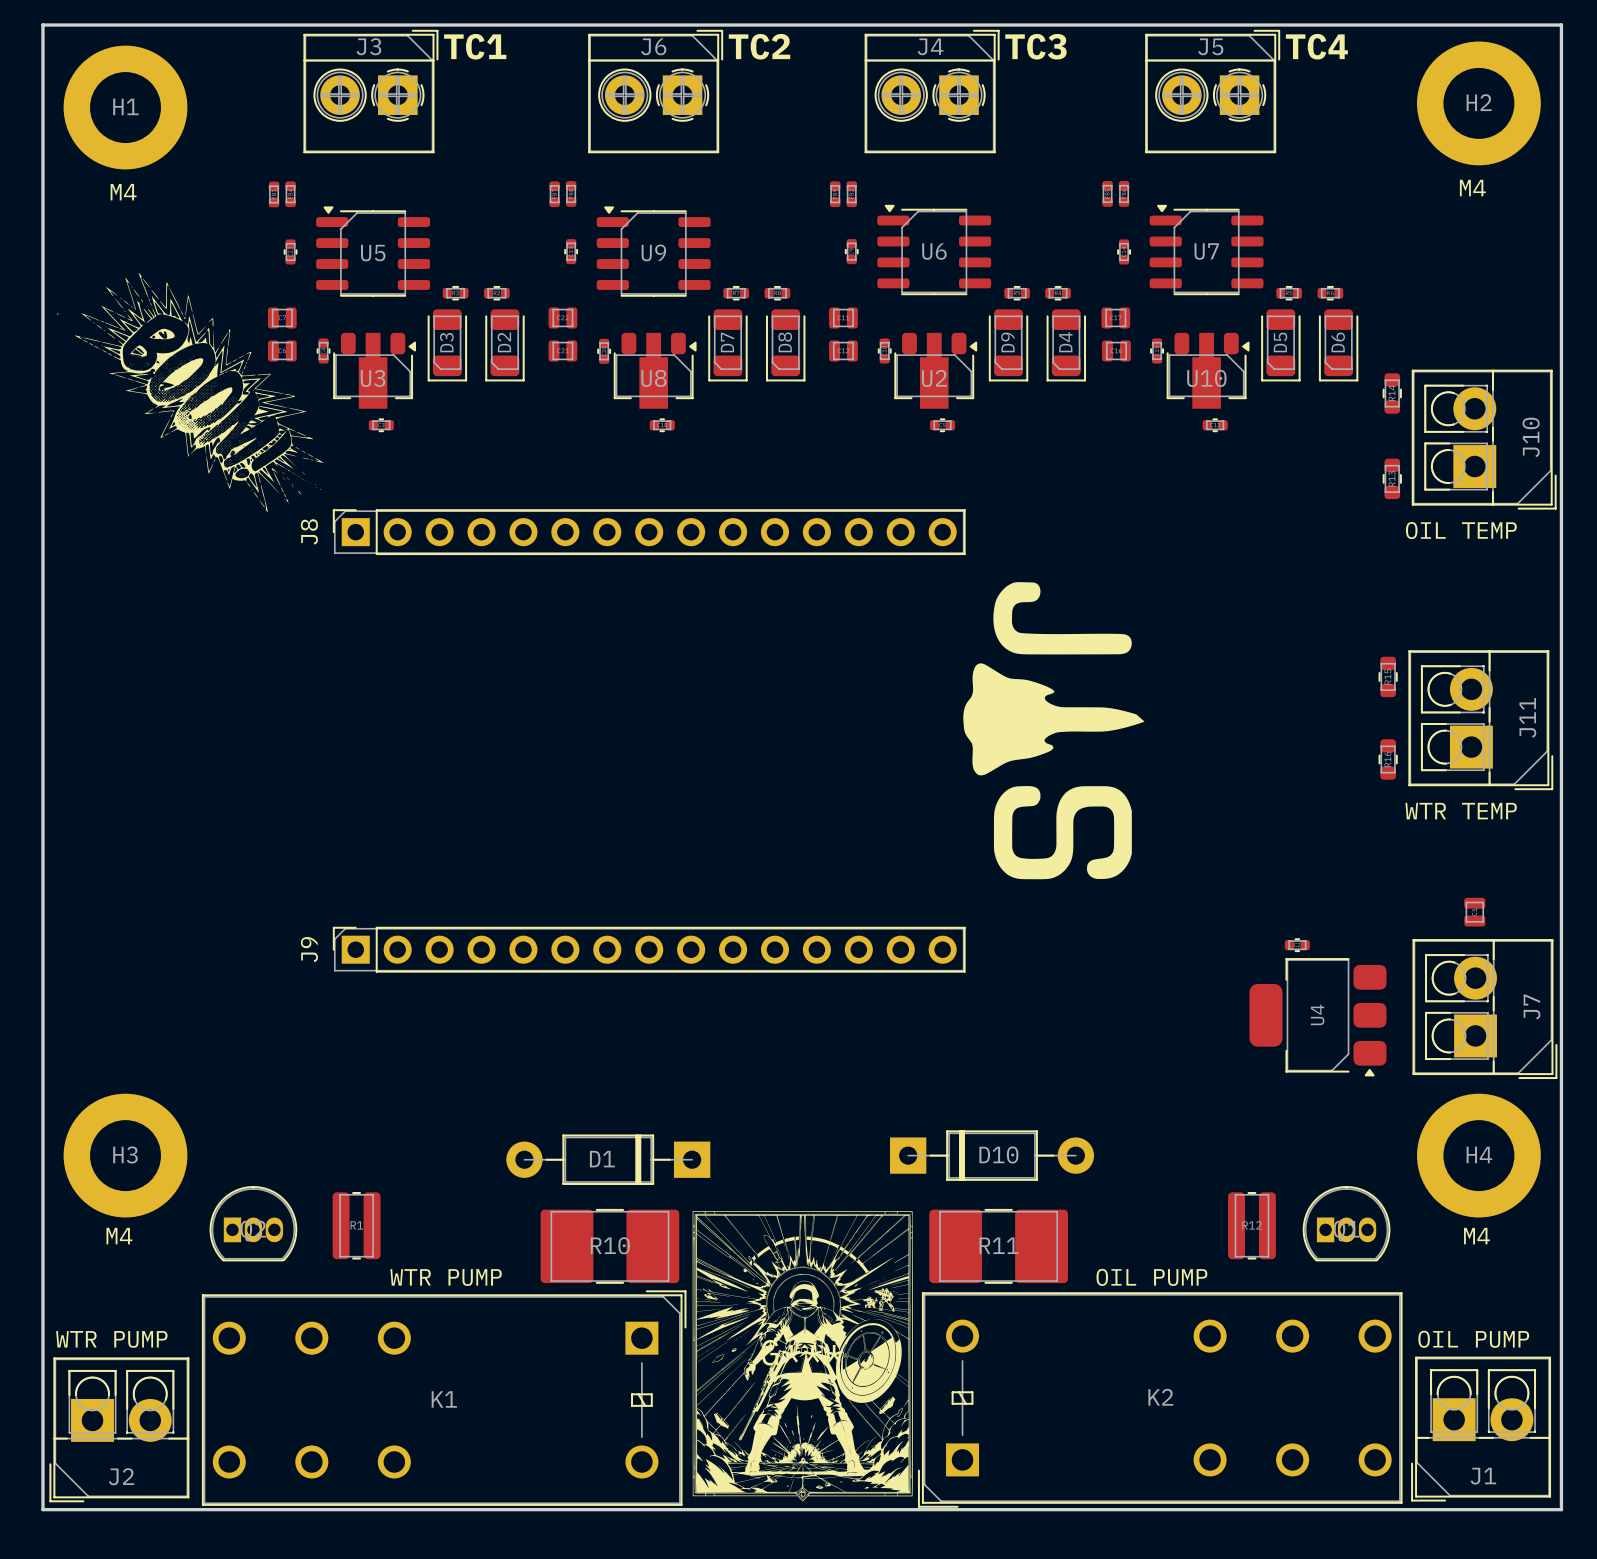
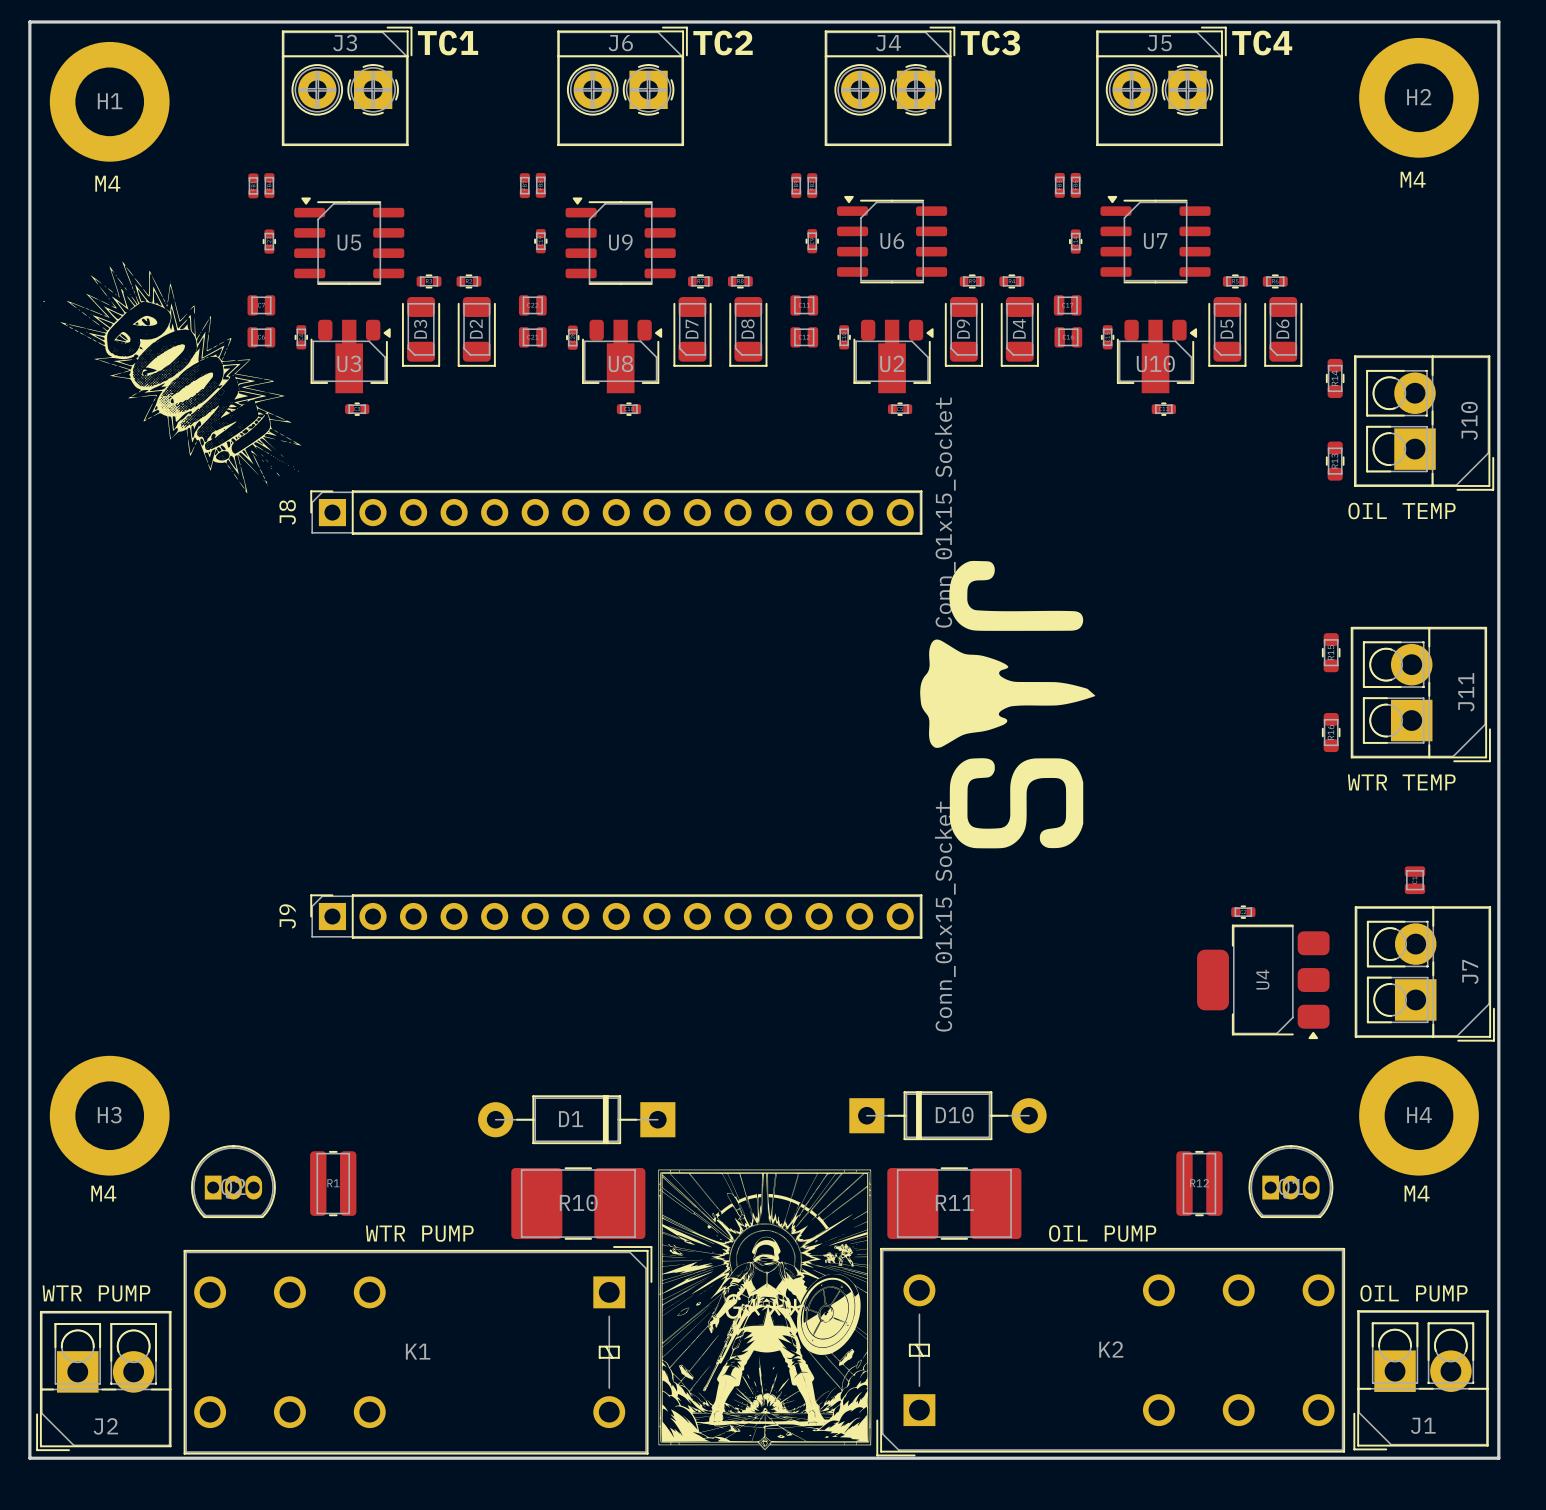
J8 value: none -> Conn_01x15_Socket (945, 512)
J9 value: none -> Conn_01x15_Socket (945, 916)

